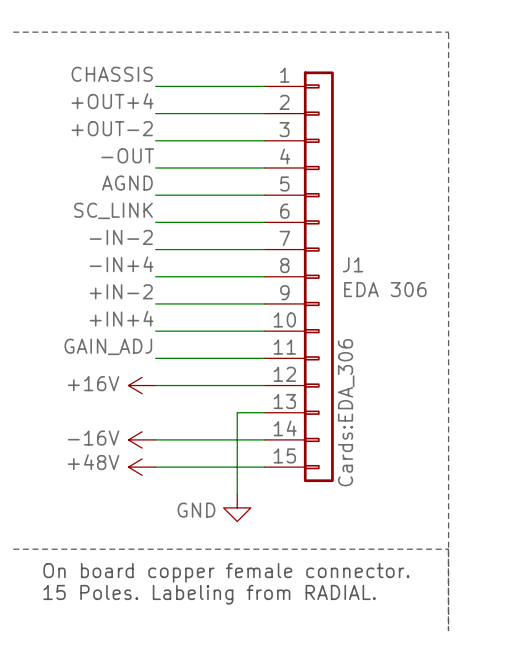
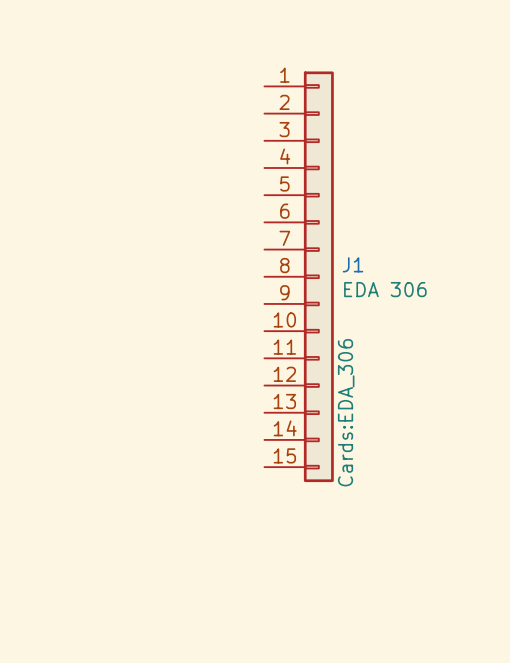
line: (13, 32) (448, 32) -> none
line: (448, 32) (448, 631) -> none
label: CHASSIS (112, 74) -> none
wire: (155, 86) (264, 86) -> none
label: +OUT+4 (112, 101) -> none
wire: (155, 113) (264, 113) -> none
label: +OUT-2 (112, 128) -> none
wire: (155, 140) (264, 140) -> none
label: -OUT (127, 155) -> none
wire: (155, 167) (264, 167) -> none
label: AGND (127, 183) -> none
wire: (155, 195) (264, 195) -> none
label: SC_LINK (113, 210) -> none
wire: (155, 222) (264, 222) -> none
label: -IN-2 (121, 237) -> none
wire: (155, 249) (264, 249) -> none
label: -IN+4 (121, 264) -> none
wire: (155, 276) (264, 276) -> none
label: +IN-2 (121, 291) -> none
wire: (155, 303) (264, 303) -> none
label: +IN+4 (121, 318) -> none
wire: (155, 331) (264, 331) -> none
label: GAIN_ADJ (108, 346) -> none
wire: (155, 358) (264, 358) -> none
power symbol: +16V (142, 385) -> none
wire: (155, 385) (264, 385) -> none
wire: (264, 412) (237, 412) (237, 494) -> none
power symbol: -16V (142, 439) -> none
wire: (155, 439) (264, 439) -> none
power symbol: +48V (142, 467) -> none
wire: (155, 467) (264, 467) -> none
power symbol: GND (237, 507) -> none
line: (13, 549) (448, 549) (448, 630) -> none
text: On board copper female connector. (226, 572) -> none
text: 15 Poles. Labeling from RADIAL. (209, 594) -> none

